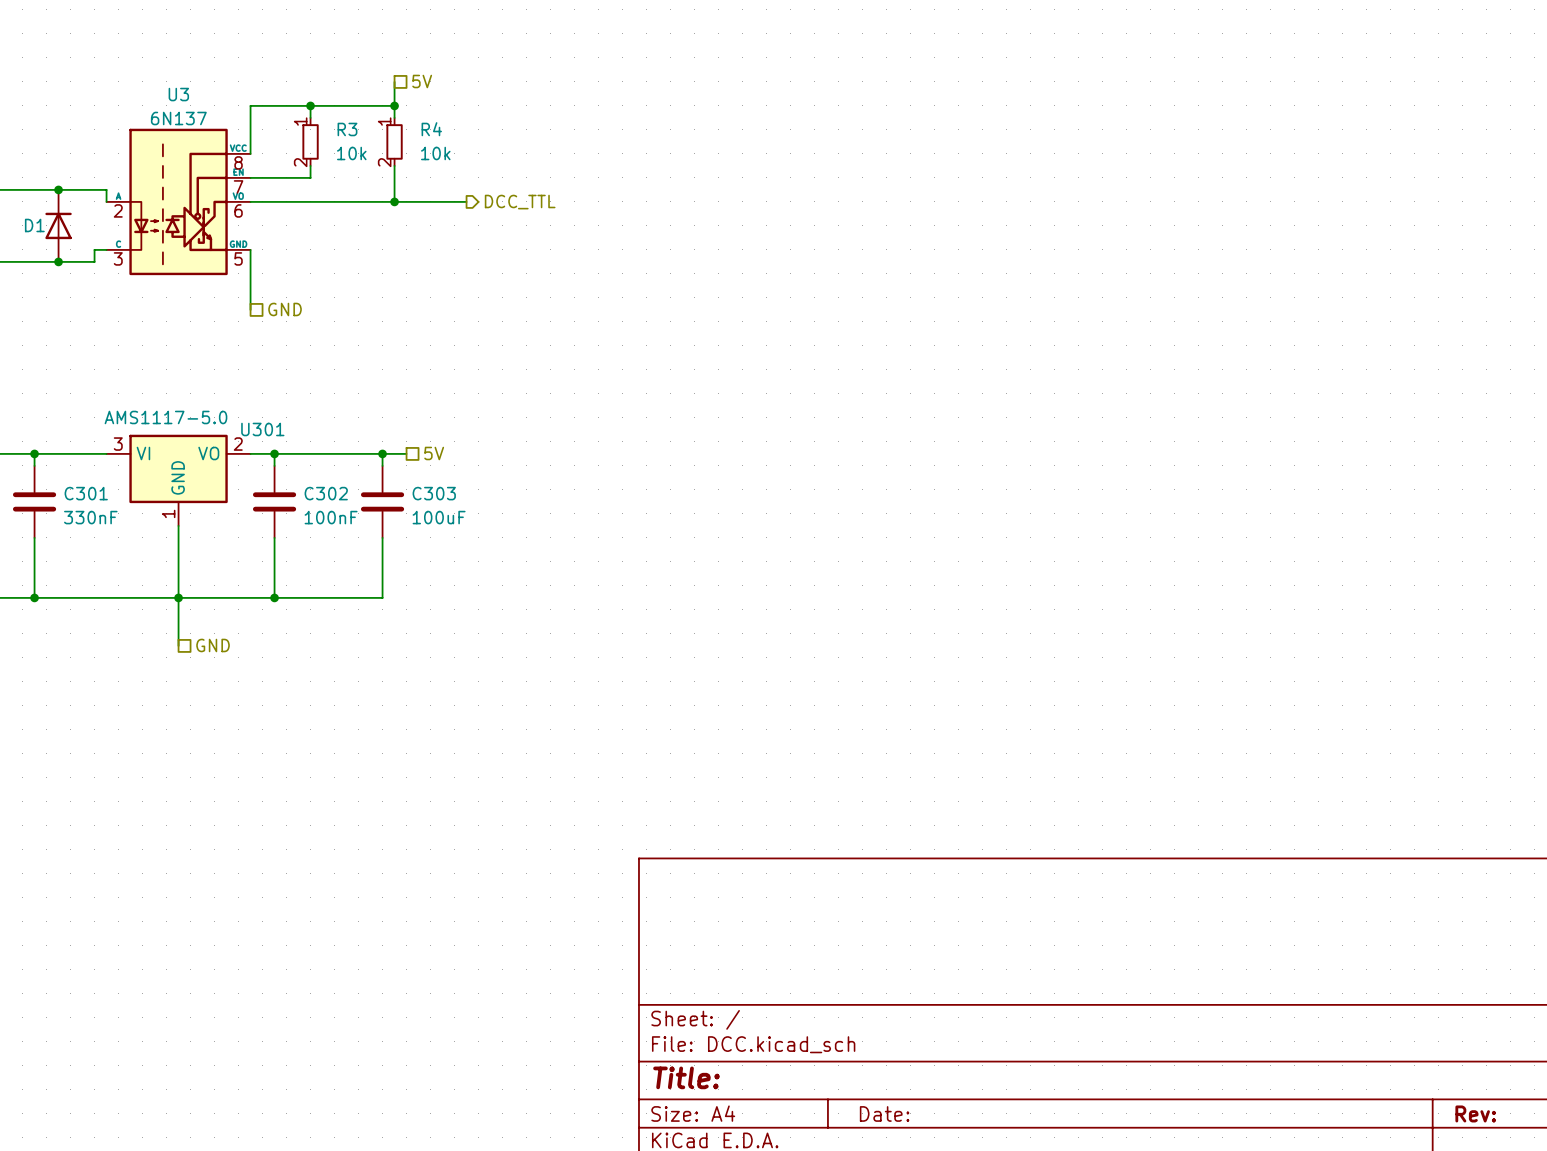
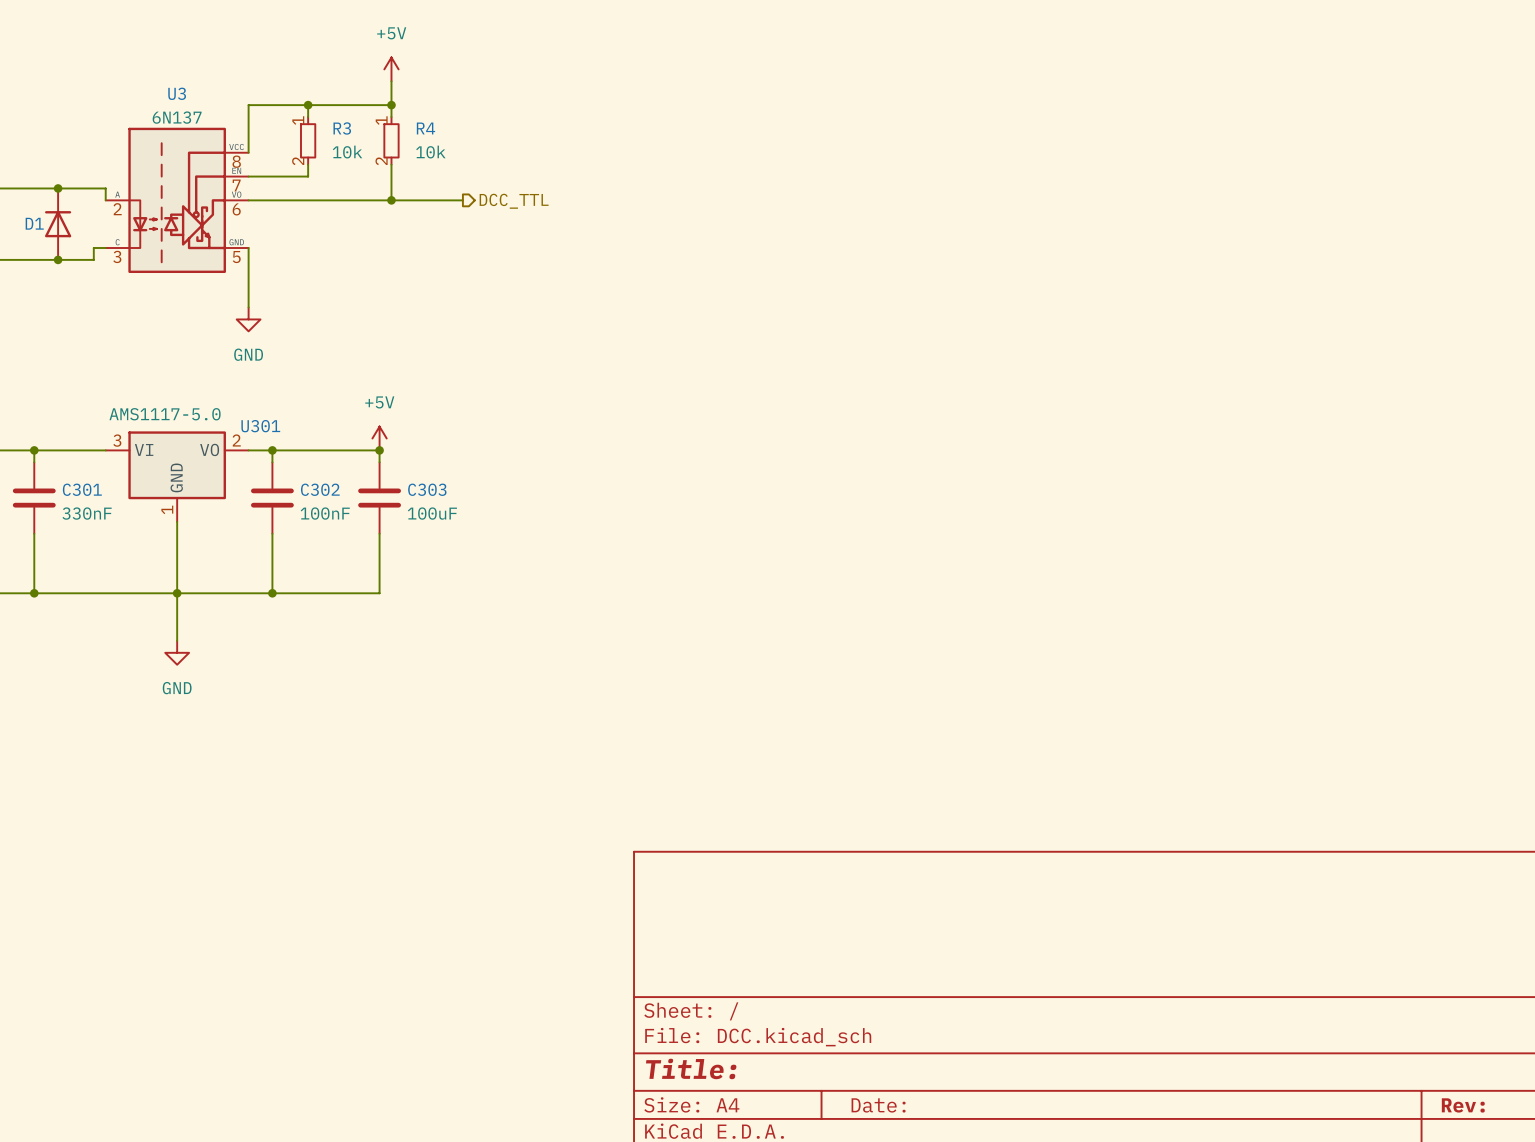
power symbol: none -> +5V (391, 69)
hierarchical label: 5V (422, 81) -> none
hierarchical label: GND (285, 309) -> none
power symbol: none -> GND (248, 319)
power symbol: none -> +5V (379, 438)
wire: (382, 453) (406, 453) -> none
hierarchical label: 5V (434, 453) -> none
hierarchical label: GND (213, 645) -> none
power symbol: none -> GND (177, 652)

